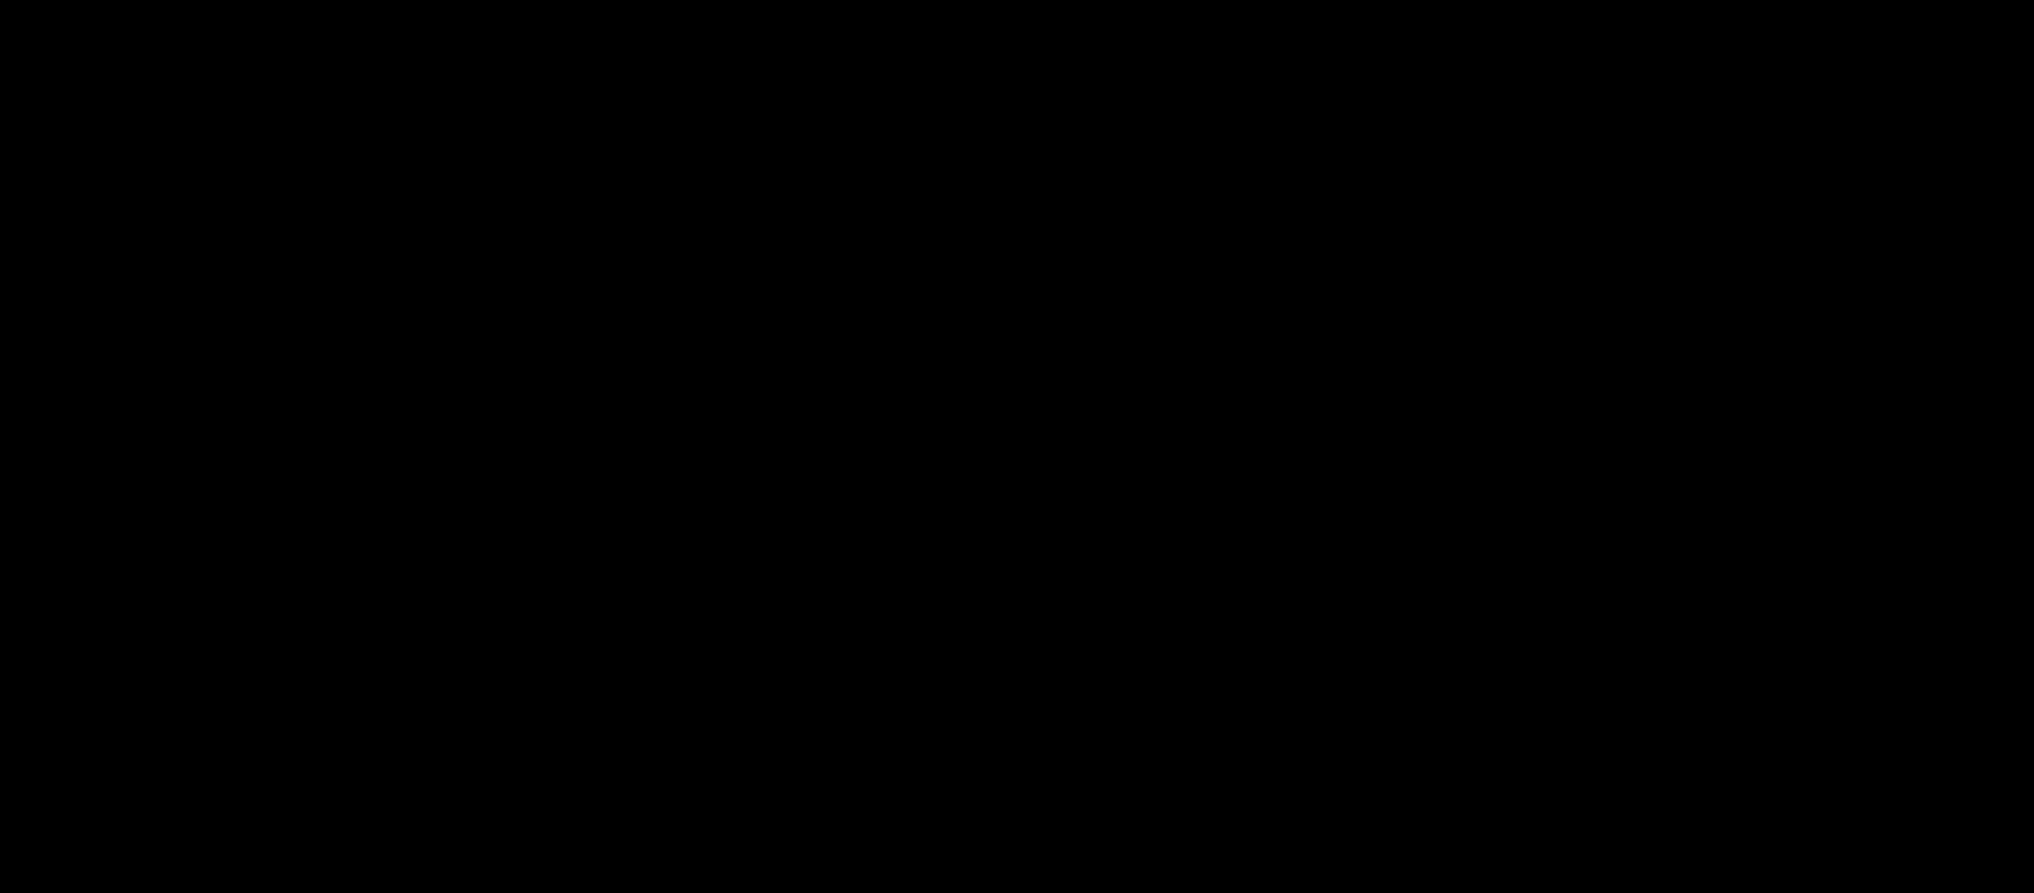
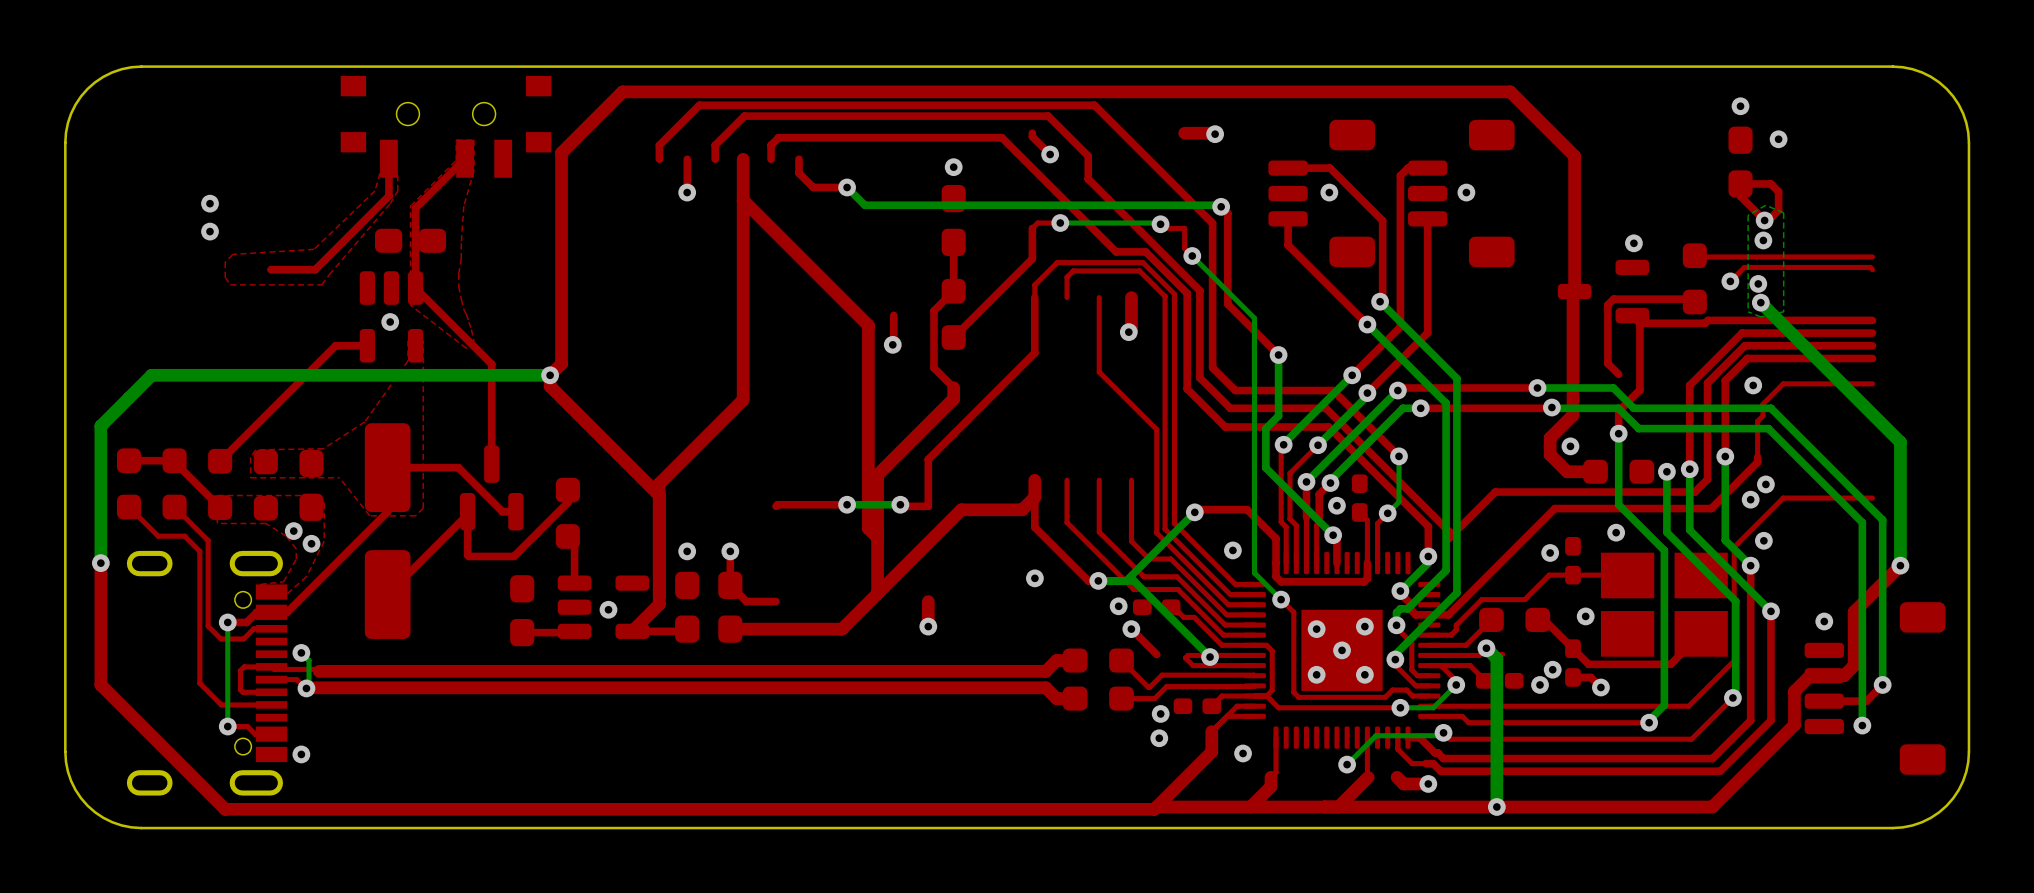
board edge: none -> (1892, 66) (141, 66) (112, 72) (95, 82) (75, 104) (67, 123) (65, 142) (65, 751) (71, 781) (87, 805) (103, 817) (121, 825) (141, 828) (1892, 828) (1921, 822) (1939, 812) (1953, 798) (1963, 781) (1968, 761) (1968, 142) (1963, 113) (1946, 88) (1921, 72) (1892, 66)
via: none -> (1740, 106)
part: none -> (446, 126)
top track: none -> (1032, 133) (1032, 136) (1050, 154)
top track: none -> (1184, 133) (1215, 134)
via: none -> (1215, 134)
via: none -> (1778, 139)
top zone outline: none -> (473, 140) (456, 140) (456, 160) (410, 206) (410, 305) (466, 348) (473, 340) (461, 299) (458, 273) (463, 206) (473, 170) (473, 140)
via: none -> (1050, 154)
top track: none -> (388, 158) (388, 196) (315, 269) (270, 269)
top track: none -> (465, 158) (415, 208) (415, 288) (491, 364) (491, 464)
top track: none -> (659, 159) (659, 145) (699, 105) (1094, 105) (1212, 223) (1212, 367) (1235, 390) (1333, 390) (1399, 456)
top track: none -> (687, 159) (687, 192)
top track: none -> (715, 159) (715, 145) (744, 116) (1048, 116) (1088, 156) (1088, 179) (1199, 290) (1199, 377) (1230, 408) (1325, 408) (1448, 531) (1448, 538) (1495, 492) (1694, 492) (1707, 479) (1707, 383) (1744, 345) (1872, 345)
top track: none -> (743, 159) (743, 399) (659, 483) (659, 604) (632, 631) (684, 631) (687, 629)
top track: none -> (771, 159) (771, 145) (778, 137) (1001, 137) (1116, 251) (1145, 251) (1187, 293) (1187, 388) (1225, 427) (1328, 427) (1428, 526) (1428, 556)
top track: none -> (798, 159) (798, 173) (813, 187) (847, 187)
part: none -> (1740, 162)
via: none -> (953, 167)
top track: none -> (1288, 168) (1330, 168) (1382, 220) (1382, 299) (1380, 301)
top track: none -> (1427, 168) (1408, 168) (1400, 175) (1400, 327) (1352, 375)
top zone outline: none -> (397, 173) (397, 190) (390, 203) (321, 284) (230, 284) (225, 277) (225, 262) (232, 254) (314, 249) (374, 190) (380, 173) (397, 173)
top track: none -> (1770, 183) (1778, 191) (1778, 210) (1770, 217) (1764, 220) (1740, 196) (1740, 183) (1770, 183)
bottom track: none -> (847, 187) (864, 205) (1219, 205) (1221, 206)
via: none -> (847, 187)
via: none -> (687, 192)
via: none -> (1329, 192)
via: none -> (1466, 192)
part: none -> (1321, 193)
part: none -> (1461, 193)
top track: none -> (743, 200) (868, 325) (868, 528) (877, 537)
via: none -> (210, 203)
bottom zone outline: none -> (1765, 205) (1748, 215) (1748, 311) (1760, 316) (1783, 311) (1783, 212) (1765, 205)
top track: none -> (1221, 206) (1227, 213) (1227, 304) (1278, 354)
via: none -> (1221, 206)
top track: none -> (1288, 218) (1288, 245) (1367, 324)
top track: none -> (1427, 218) (1427, 332) (1367, 393)
part: none -> (953, 220)
via: none -> (1764, 220)
top track: none -> (1060, 223) (1037, 223) (1032, 228) (1032, 258) (953, 337)
bottom track: none -> (1060, 223) (1160, 224)
via: none -> (1060, 223)
top track: none -> (1160, 224) (1164, 228) (1184, 228) (1184, 248) (1192, 256)
via: none -> (1160, 224)
via: none -> (210, 231)
part: none -> (410, 240)
via: none -> (1763, 240)
top track: none -> (953, 242) (953, 291) (934, 310) (934, 368) (953, 387) (953, 398) (877, 474) (877, 593)
via: none -> (1633, 243)
top track: none -> (1694, 255) (1872, 256)
bottom track: none -> (1192, 256) (1254, 318) (1254, 572) (1281, 599)
via: none -> (1192, 256)
top track: none -> (1872, 269) (1870, 267) (1744, 267) (1730, 281)
part: none -> (1694, 278)
via: none -> (1730, 281)
via: none -> (1758, 283)
part: none -> (1603, 291)
top track: none -> (1067, 297) (1067, 277) (1073, 270) (1139, 270) (1165, 296) (1165, 529) (1230, 594) (1254, 594)
top track: none -> (1099, 297) (1099, 372) (1156, 429) (1156, 533) (1228, 604) (1254, 604)
top track: none -> (1131, 297) (1131, 329) (1128, 332)
bottom track: none -> (1380, 301) (1456, 378) (1456, 592) (1395, 654) (1395, 659)
via: none -> (1380, 301)
top track: none -> (1694, 302) (1691, 299) (1613, 299) (1607, 304) (1607, 363) (1618, 374)
bottom track: none -> (1760, 302) (1900, 442) (1900, 565)
via: none -> (1760, 302)
part: none -> (953, 314)
top track: none -> (893, 315) (892, 344)
part: none -> (391, 316)
top track: none -> (1872, 320) (1708, 320) (1705, 323) (1639, 323)
via: none -> (390, 322)
top track: none -> (1639, 323) (1639, 389) (1618, 411) (1618, 433)
bottom track: none -> (1367, 324) (1446, 403) (1446, 570) (1407, 608) (1400, 608) (1396, 612) (1396, 625)
via: none -> (1367, 324)
via: none -> (1128, 332)
top track: none -> (1872, 333) (1742, 333) (1689, 385) (1689, 469)
top zone outline: none -> (423, 340) (423, 508) (415, 515) (369, 515) (339, 477) (250, 477) (250, 457) (255, 449) (323, 448) (364, 421) (407, 361) (407, 340) (423, 340)
via: none -> (892, 344)
top track: none -> (367, 345) (335, 345) (220, 461)
bottom track: none -> (1278, 354) (1278, 415) (1265, 428) (1265, 467) (1333, 535)
via: none -> (1278, 354)
top track: none -> (1872, 358) (1747, 358) (1725, 380) (1725, 456)
bottom track: none -> (550, 375) (151, 375) (100, 426) (100, 563)
via: none -> (550, 375)
bottom track: none -> (1352, 375) (1283, 444)
via: none -> (1352, 375)
top track: none -> (1872, 383) (1783, 383) (1763, 404) (1763, 415) (1757, 421) (1757, 462) (1711, 508) (1554, 508) (1448, 614) (1415, 614) (1410, 609) (1410, 603) (1400, 593) (1400, 591)
via: none -> (1753, 385)
top track: none -> (1537, 387) (1400, 387) (1397, 390)
bottom track: none -> (1537, 387) (1613, 387) (1633, 408) (1770, 408) (1882, 519) (1882, 684)
via: none -> (1537, 387)
bottom track: none -> (1397, 390) (1306, 481)
via: none -> (1397, 390)
bottom track: none -> (1367, 393) (1367, 395) (1318, 445)
via: none -> (1367, 393)
top track: none -> (1551, 407) (1420, 408)
bottom track: none -> (1551, 407) (1618, 408) (1638, 428) (1768, 428) (1862, 522) (1862, 725)
via: none -> (1551, 407)
bottom track: none -> (1420, 408) (1402, 408) (1329, 481) (1330, 483)
via: none -> (1420, 408)
bottom track: none -> (1618, 433) (1618, 504) (1664, 550) (1664, 705) (1649, 720)
via: none -> (1618, 433)
top track: none -> (1283, 444) (1281, 447) (1281, 521) (1286, 527) (1286, 563)
via: none -> (1283, 444)
top track: none -> (1318, 445) (1289, 473) (1289, 519) (1296, 525) (1296, 563)
via: none -> (1318, 445)
via: none -> (1570, 446)
bottom track: none -> (1399, 456) (1399, 502) (1387, 513)
via: none -> (1399, 456)
bottom track: none -> (1725, 456) (1725, 540) (1750, 565)
via: none -> (1725, 456)
top track: none -> (129, 460) (174, 460) (220, 507)
bottom track: none -> (1689, 469) (1689, 530) (1770, 611)
via: none -> (1689, 469)
top track: none -> (1595, 471) (1567, 471) (1550, 454) (1550, 437) (1573, 415) (1574, 156) (1510, 91) (622, 91) (561, 152) (561, 363) (550, 375) (550, 386) (659, 495)
part: none -> (1618, 471)
bottom track: none -> (1666, 471) (1666, 532) (1735, 601) (1735, 697)
via: none -> (1666, 471)
top track: none -> (1067, 480) (1067, 522) (1133, 589) (1177, 589) (1223, 635) (1254, 635)
top track: none -> (1099, 480) (1099, 531) (1144, 576) (1176, 576) (1225, 624) (1254, 624)
top track: none -> (1131, 480) (1131, 541) (1149, 559) (1170, 559) (1226, 614) (1254, 614)
top track: none -> (1306, 481) (1306, 563)
via: none -> (1306, 481)
part: none -> (129, 483)
part: none -> (174, 483)
top track: none -> (1330, 483) (1319, 494) (1319, 517)
via: none -> (1330, 483)
part: none -> (220, 484)
via: none -> (1765, 484)
part: none -> (265, 485)
part: none -> (311, 485)
part: none -> (491, 487)
top track: none -> (567, 490) (567, 502) (513, 556) (468, 556) (467, 511)
top zone outline: none -> (314, 495) (217, 495) (215, 508) (217, 523) (265, 523) (286, 536) (296, 548) (296, 559) (283, 581) (260, 584) (260, 597) (283, 597) (306, 576) (324, 541) (324, 503) (314, 495)
part: none -> (1359, 498)
top track: none -> (1872, 498) (1783, 498) (1734, 547) (1734, 660) (1688, 706) (1429, 706)
via: none -> (1750, 499)
top track: none -> (847, 504) (777, 504) (776, 506)
via: none -> (847, 504)
top track: none -> (900, 504) (928, 506) (928, 459) (1034, 352) (1034, 285) (1057, 262) (1142, 262) (1174, 294) (1174, 523) (1235, 584) (1254, 584)
bottom track: none -> (900, 504) (847, 504)
via: none -> (900, 504)
via: none -> (1336, 505)
top track: none -> (129, 507) (158, 536) (184, 536) (199, 551) (199, 683) (221, 704) (271, 704)
top track: none -> (174, 507) (208, 540) (208, 626) (220, 638) (243, 638) (253, 628) (271, 628)
top track: none -> (515, 511) (502, 511) (458, 467) (387, 467) (387, 511) (287, 612) (256, 612) (246, 622) (227, 622)
top track: none -> (1194, 512) (1197, 509) (1247, 509) (1276, 538) (1276, 576) (1281, 581) (1363, 581) (1367, 578) (1367, 520) (1359, 512)
bottom track: none -> (1194, 512) (1126, 580)
via: none -> (1194, 512)
part: none -> (567, 513)
top track: none -> (1387, 513) (1377, 523) (1377, 563)
via: none -> (1387, 513)
top track: none -> (467, 514) (387, 594)
top track: none -> (1319, 517) (1319, 522) (1316, 525) (1316, 563)
top track: none -> (574, 530) (574, 583)
via: none -> (293, 531)
part: none -> (387, 531)
via: none -> (1616, 532)
top track: none -> (1333, 535) (1336, 539) (1336, 563)
via: none -> (1333, 535)
via: none -> (1763, 540)
via: none -> (311, 543)
via: none -> (1232, 550)
via: none -> (687, 551)
top track: none -> (730, 551) (730, 585) (746, 601) (776, 601)
via: none -> (730, 551)
via: none -> (1550, 552)
bottom track: none -> (1428, 556) (1428, 563) (1400, 591)
via: none -> (1428, 556)
part: none -> (1573, 560)
top track: none -> (100, 563) (100, 684) (225, 809) (1154, 809) (1211, 751) (1211, 731) (1237, 706) (1254, 706)
via: none -> (100, 563)
top track: none -> (1750, 565) (1750, 720) (1712, 758) (1443, 758) (1419, 737) (1408, 737)
via: none -> (1750, 565)
top track: none -> (1900, 565) (1854, 611) (1854, 665) (1843, 675) (1810, 675) (1794, 691) (1794, 724) (1712, 806) (1156, 806)
via: none -> (1900, 565)
top track: none -> (1627, 575) (1549, 575) (1524, 599) (1481, 599) (1456, 625) (1456, 630) (1451, 635) (1429, 635)
via: none -> (1034, 578)
top track: none -> (1098, 580) (1088, 580) (1034, 527) (1034, 480) (1034, 497) (1022, 509) (961, 509) (842, 629) (730, 629)
bottom track: none -> (1098, 580) (1133, 580) (1210, 657)
via: none -> (1098, 580)
via: none -> (1400, 591)
top track: none -> (1281, 599) (1293, 612) (1293, 692) (1298, 697) (1385, 697) (1392, 690) (1406, 690) (1412, 696) (1429, 696)
via: none -> (1281, 599)
top track: none -> (928, 601) (928, 626)
part: none -> (1664, 604)
via: none -> (1118, 606)
part: none -> (603, 607)
part: none -> (687, 607)
part: none -> (730, 607)
part: none -> (1156, 607)
top track: none -> (1173, 607) (1183, 617) (1194, 617) (1222, 645) (1266, 645) (1272, 651) (1272, 690) (1266, 696)
via: none -> (608, 609)
part: none -> (522, 610)
top track: none -> (1770, 611) (1770, 720) (1720, 771) (1440, 771) (1433, 763) (1412, 763) (1397, 749) (1397, 737)
via: none -> (1770, 611)
via: none -> (1585, 616)
top track: none -> (1491, 619) (1466, 645) (1429, 645)
part: none -> (1514, 619)
top track: none -> (1537, 619) (1544, 619) (1588, 664) (1670, 664) (1701, 633)
via: none -> (1824, 621)
bottom track: none -> (227, 622) (227, 726)
via: none -> (227, 622)
top track: none -> (1396, 625) (1396, 627) (1411, 643) (1411, 670) (1417, 675) (1429, 675)
via: none -> (1396, 625)
via: none -> (928, 626)
via: none -> (1364, 626)
top track: none -> (1131, 629) (1156, 654)
via: none -> (1131, 629)
via: none -> (1316, 629)
top track: none -> (574, 631) (522, 632)
bottom track: none -> (1486, 648) (1496, 658) (1496, 806)
via: none -> (1486, 648)
part: none -> (1342, 650)
via: none -> (1342, 650)
bottom track: none -> (301, 652) (308, 660) (308, 685) (306, 688)
via: none -> (301, 652)
top track: none -> (1502, 654) (1492, 654) (1486, 648) (1479, 655) (1429, 655)
top track: none -> (1254, 655) (1211, 655) (1210, 657) (1188, 655) (1185, 657) (1193, 665) (1254, 665)
via: none -> (1210, 657)
top track: none -> (1395, 659) (1395, 665) (1415, 685) (1429, 685)
via: none -> (1395, 659)
top track: none -> (1075, 660) (1056, 660) (1045, 671) (319, 671) (317, 669) (274, 669) (271, 666) (244, 666) (240, 670) (240, 689) (242, 692) (271, 692)
part: none -> (1098, 660)
top track: none -> (1121, 660) (1148, 687) (1161, 675) (1254, 675)
part: none -> (1573, 663)
top track: none -> (1429, 665) (1470, 665) (1485, 680)
top track: none -> (1441, 665) (1456, 680) (1456, 684)
via: none -> (1552, 669)
part: none -> (207, 673)
via: none -> (1316, 674)
via: none -> (1364, 674)
top track: none -> (1573, 677) (1590, 677) (1600, 687)
top track: none -> (271, 679) (296, 679) (305, 687) (1045, 687) (1056, 698) (1075, 698)
part: none -> (1499, 680)
bottom track: none -> (1456, 684) (1433, 707) (1400, 707)
via: none -> (1456, 684)
via: none -> (1540, 684)
top track: none -> (1882, 684) (1866, 701) (1824, 701)
via: none -> (1882, 684)
top track: none -> (1254, 685) (1166, 686) (1154, 698) (1121, 698)
via: none -> (1600, 687)
via: none -> (306, 688)
part: none -> (1875, 688)
top track: none -> (1732, 697) (1691, 739) (1449, 739) (1443, 732)
via: none -> (1732, 697)
part: none -> (1098, 698)
part: none -> (1197, 706)
top track: none -> (1211, 706) (1221, 696) (1266, 696) (1278, 707) (1400, 707)
via: none -> (1400, 707)
via: none -> (1160, 713)
top track: none -> (1254, 716) (1226, 716)
top track: none -> (1429, 716) (1462, 716) (1468, 722) (1649, 722)
via: none -> (1649, 722)
via: none -> (1862, 725)
top track: none -> (227, 726) (247, 726) (255, 734) (271, 734)
via: none -> (227, 726)
bottom track: none -> (1443, 732) (1440, 735) (1375, 735) (1347, 764)
via: none -> (1443, 732)
top track: none -> (1276, 737) (1276, 772) (1270, 777) (1270, 786) (1250, 806)
top track: none -> (1367, 737) (1368, 777) (1338, 806)
via: none -> (1159, 738)
via: none -> (1243, 753)
via: none -> (301, 754)
via: none -> (1347, 764)
top track: none -> (1397, 777) (1403, 783) (1428, 783)
via: none -> (1428, 783)
via: none -> (1496, 806)

